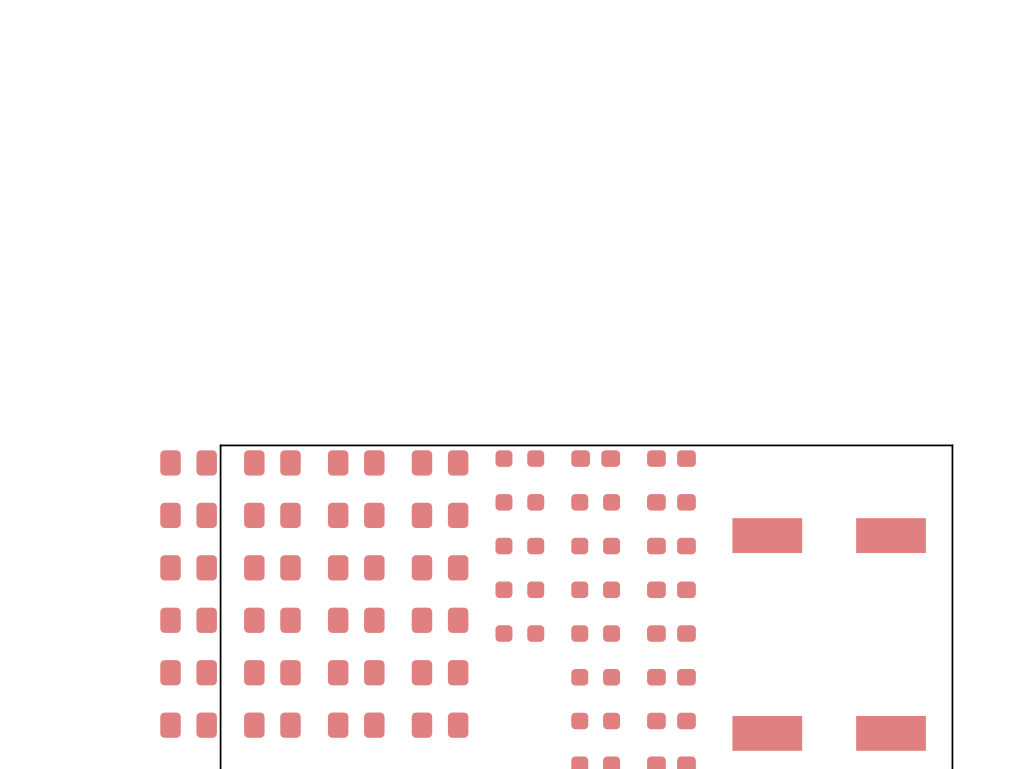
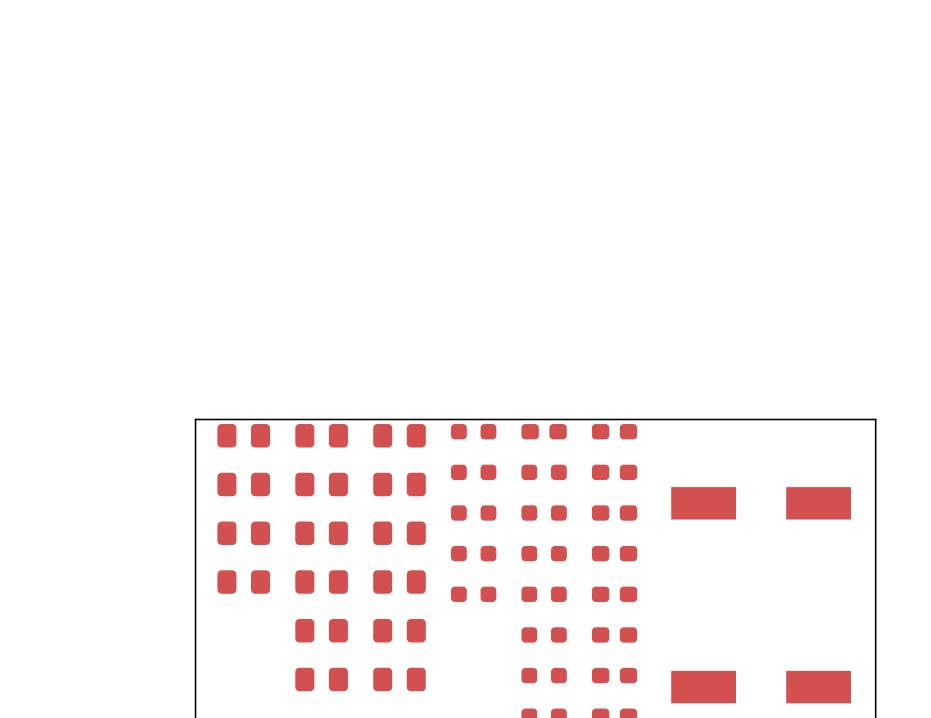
part: (188, 462) -> none
part: (188, 515) -> none
part: (188, 567) -> none
part: (188, 620) -> none
part: (188, 672) -> none
part: (272, 672) -> none
part: (188, 725) -> none
part: (272, 725) -> none

